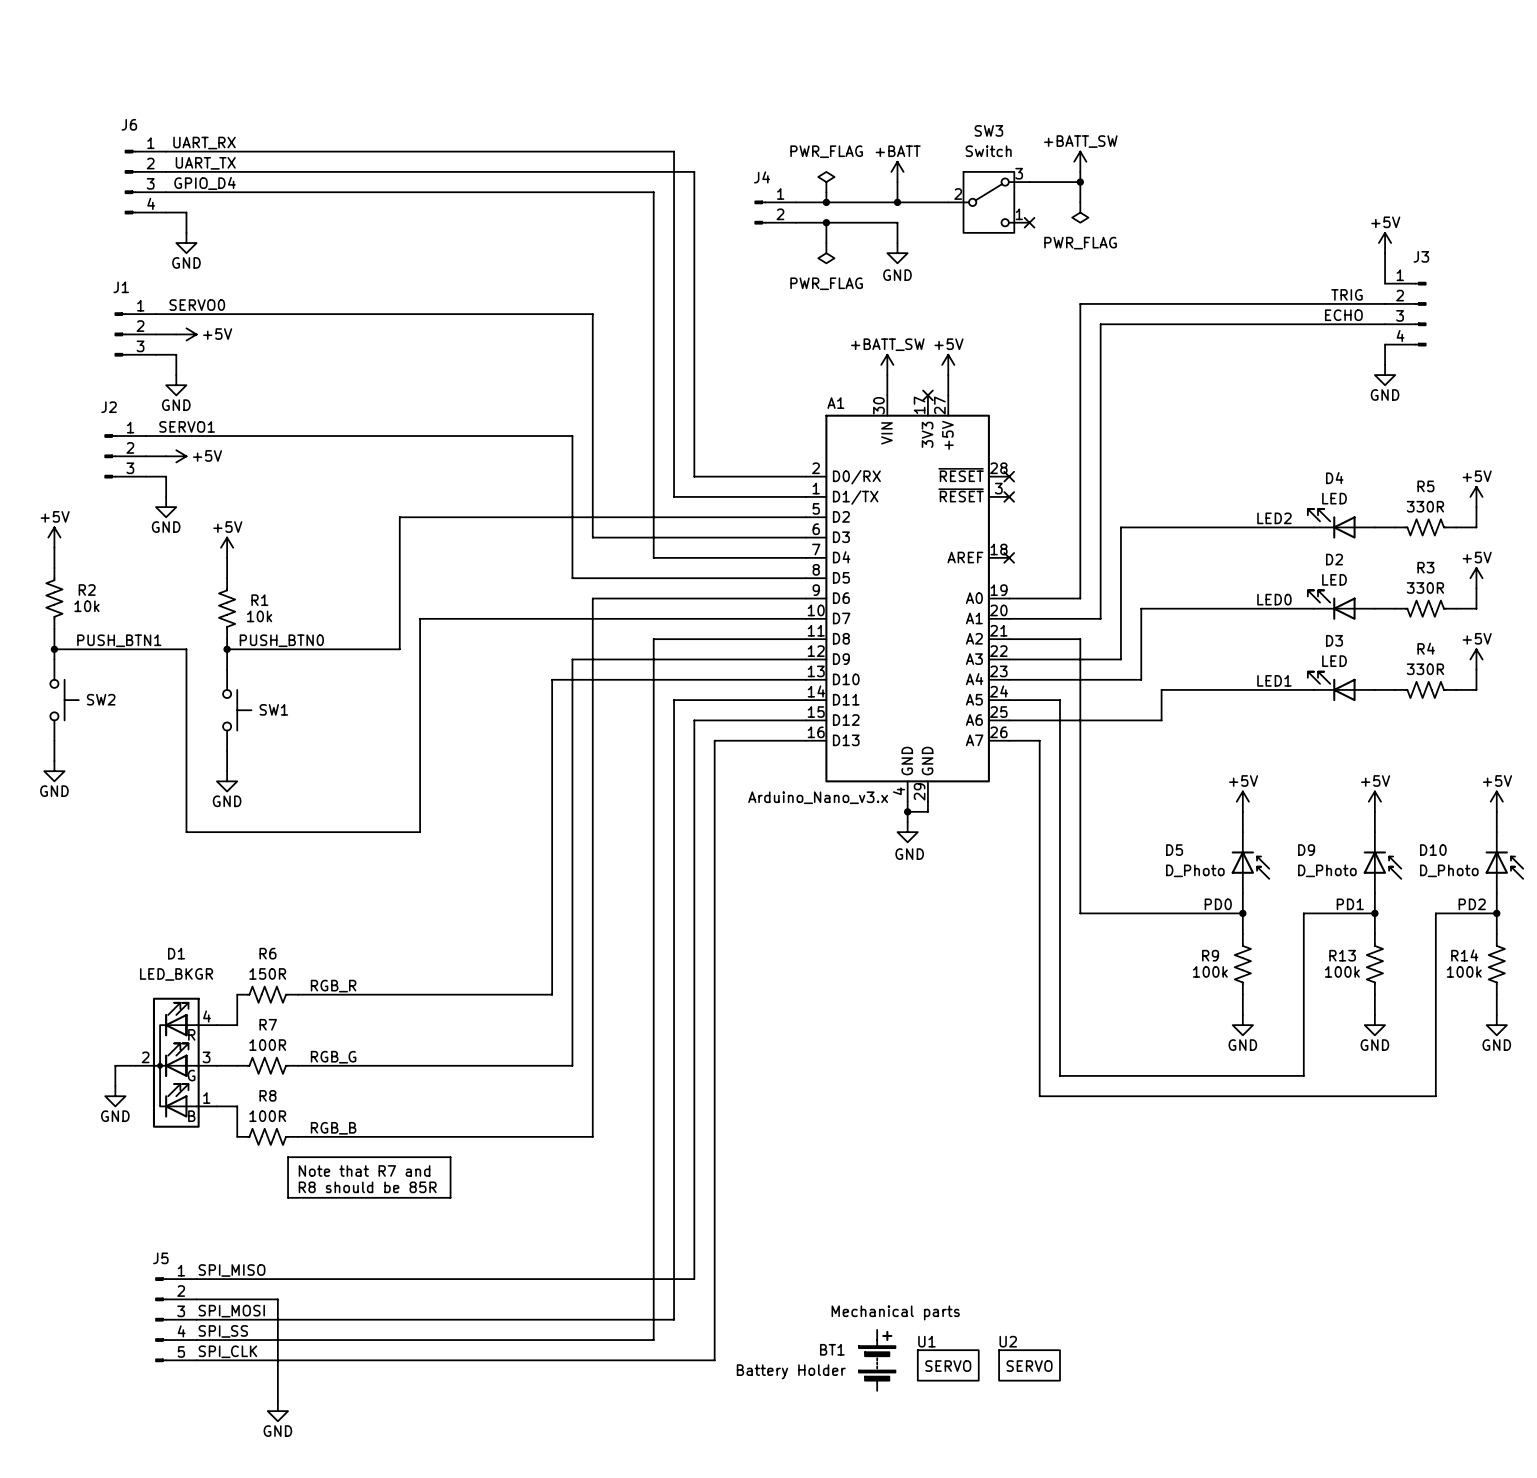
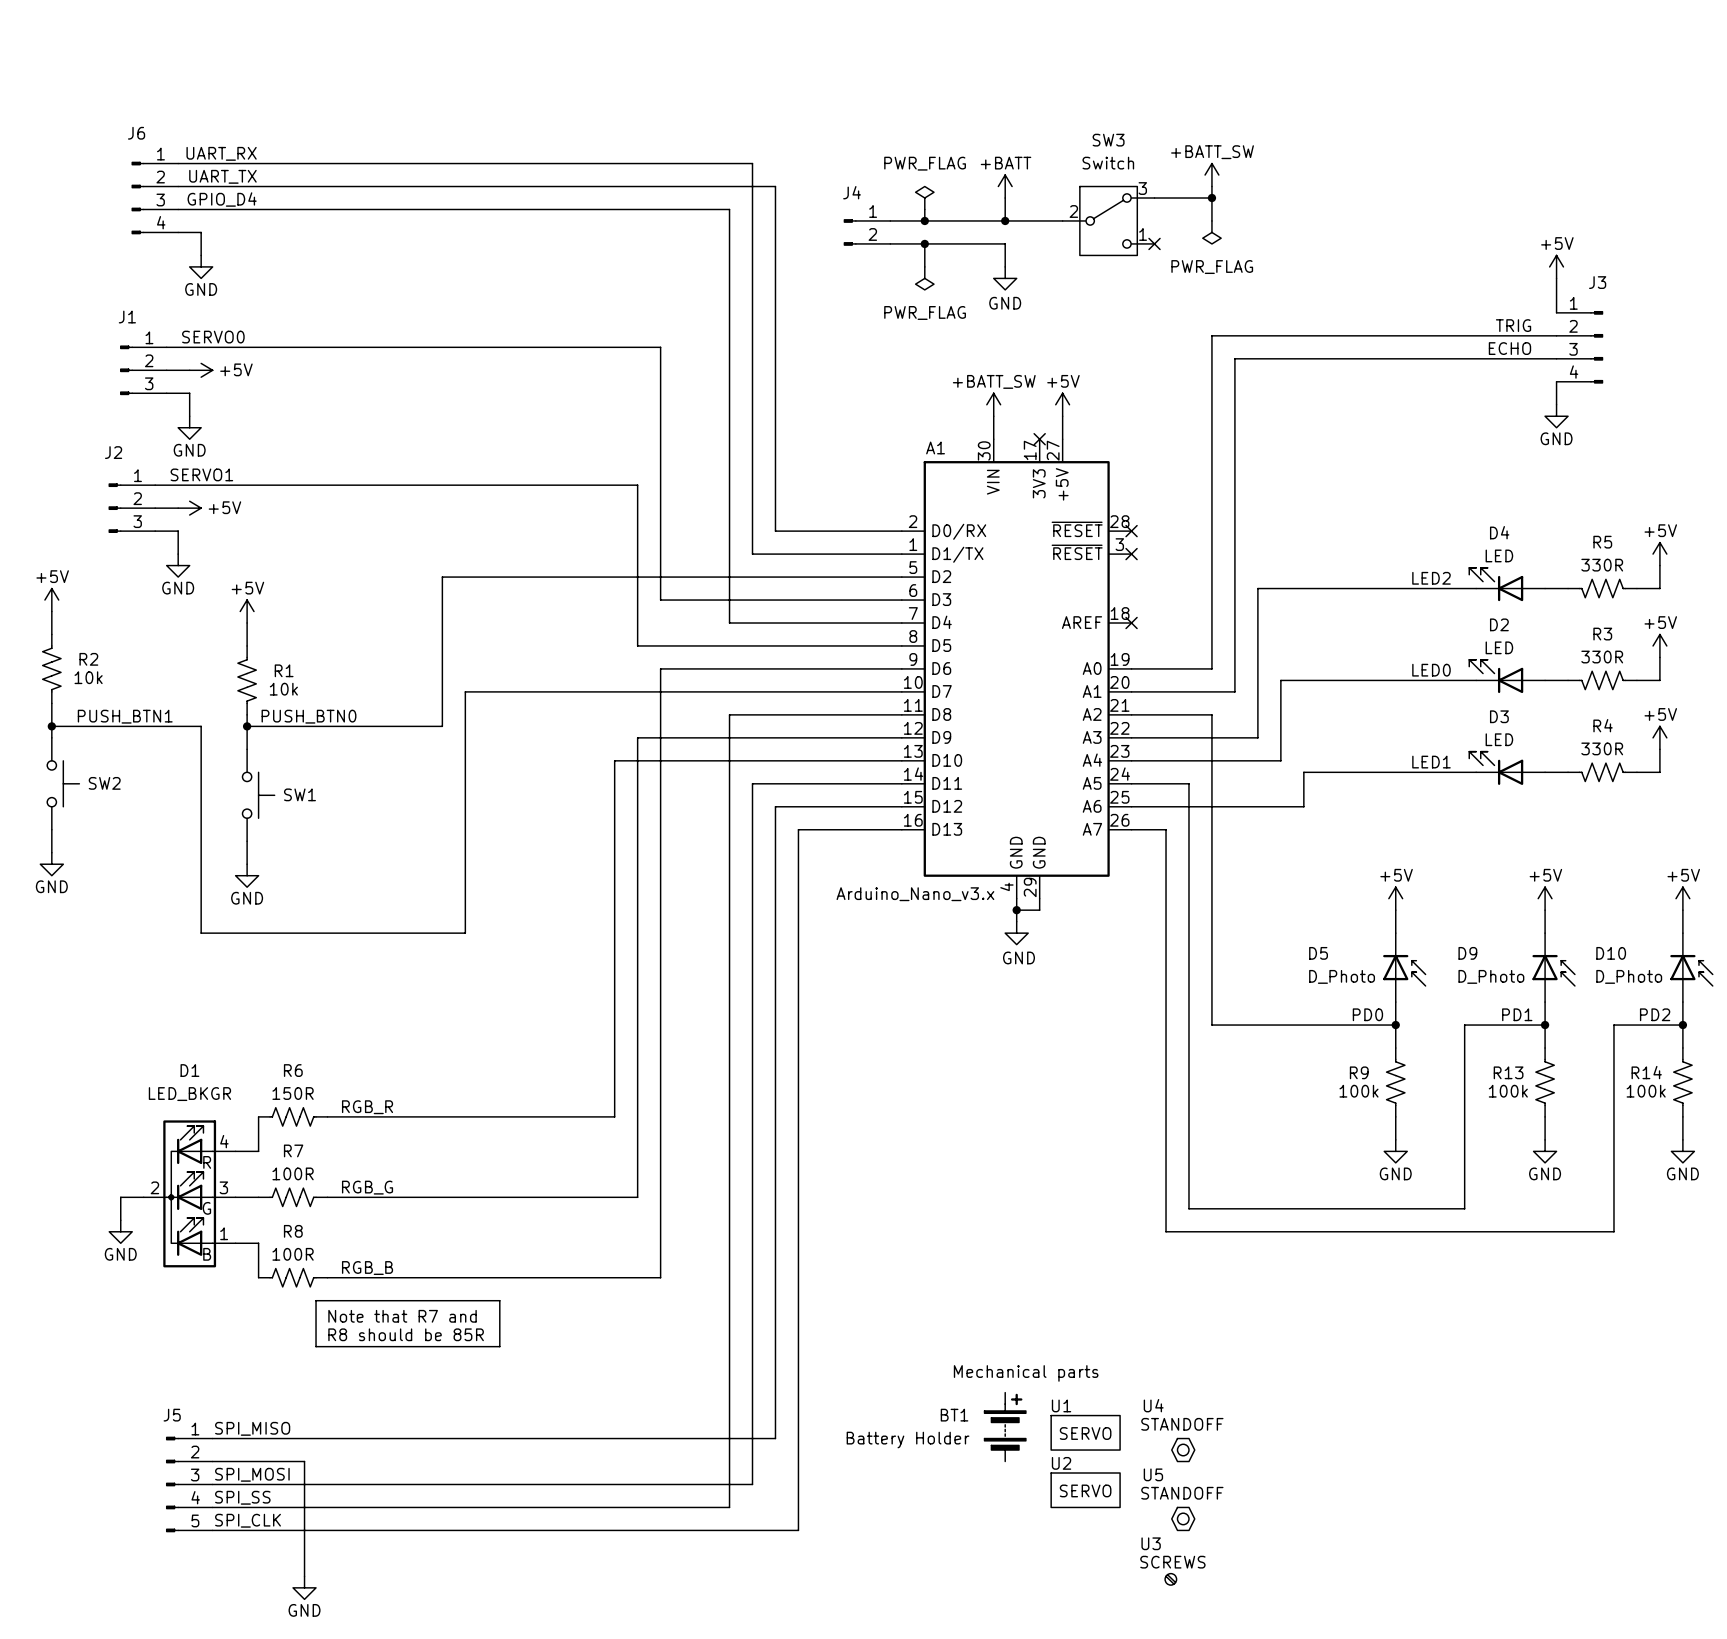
U4: none -> (1183, 1450)
text position: Mechanical parts (895, 1312) -> Mechanical parts (1026, 1373)
U5: none -> (1183, 1518)
BT1 position: (877, 1360) -> (1005, 1427)
U1 position: (948, 1365) -> (1085, 1432)
U2 position: (1029, 1365) -> (1085, 1490)
U3: none -> (1170, 1579)

